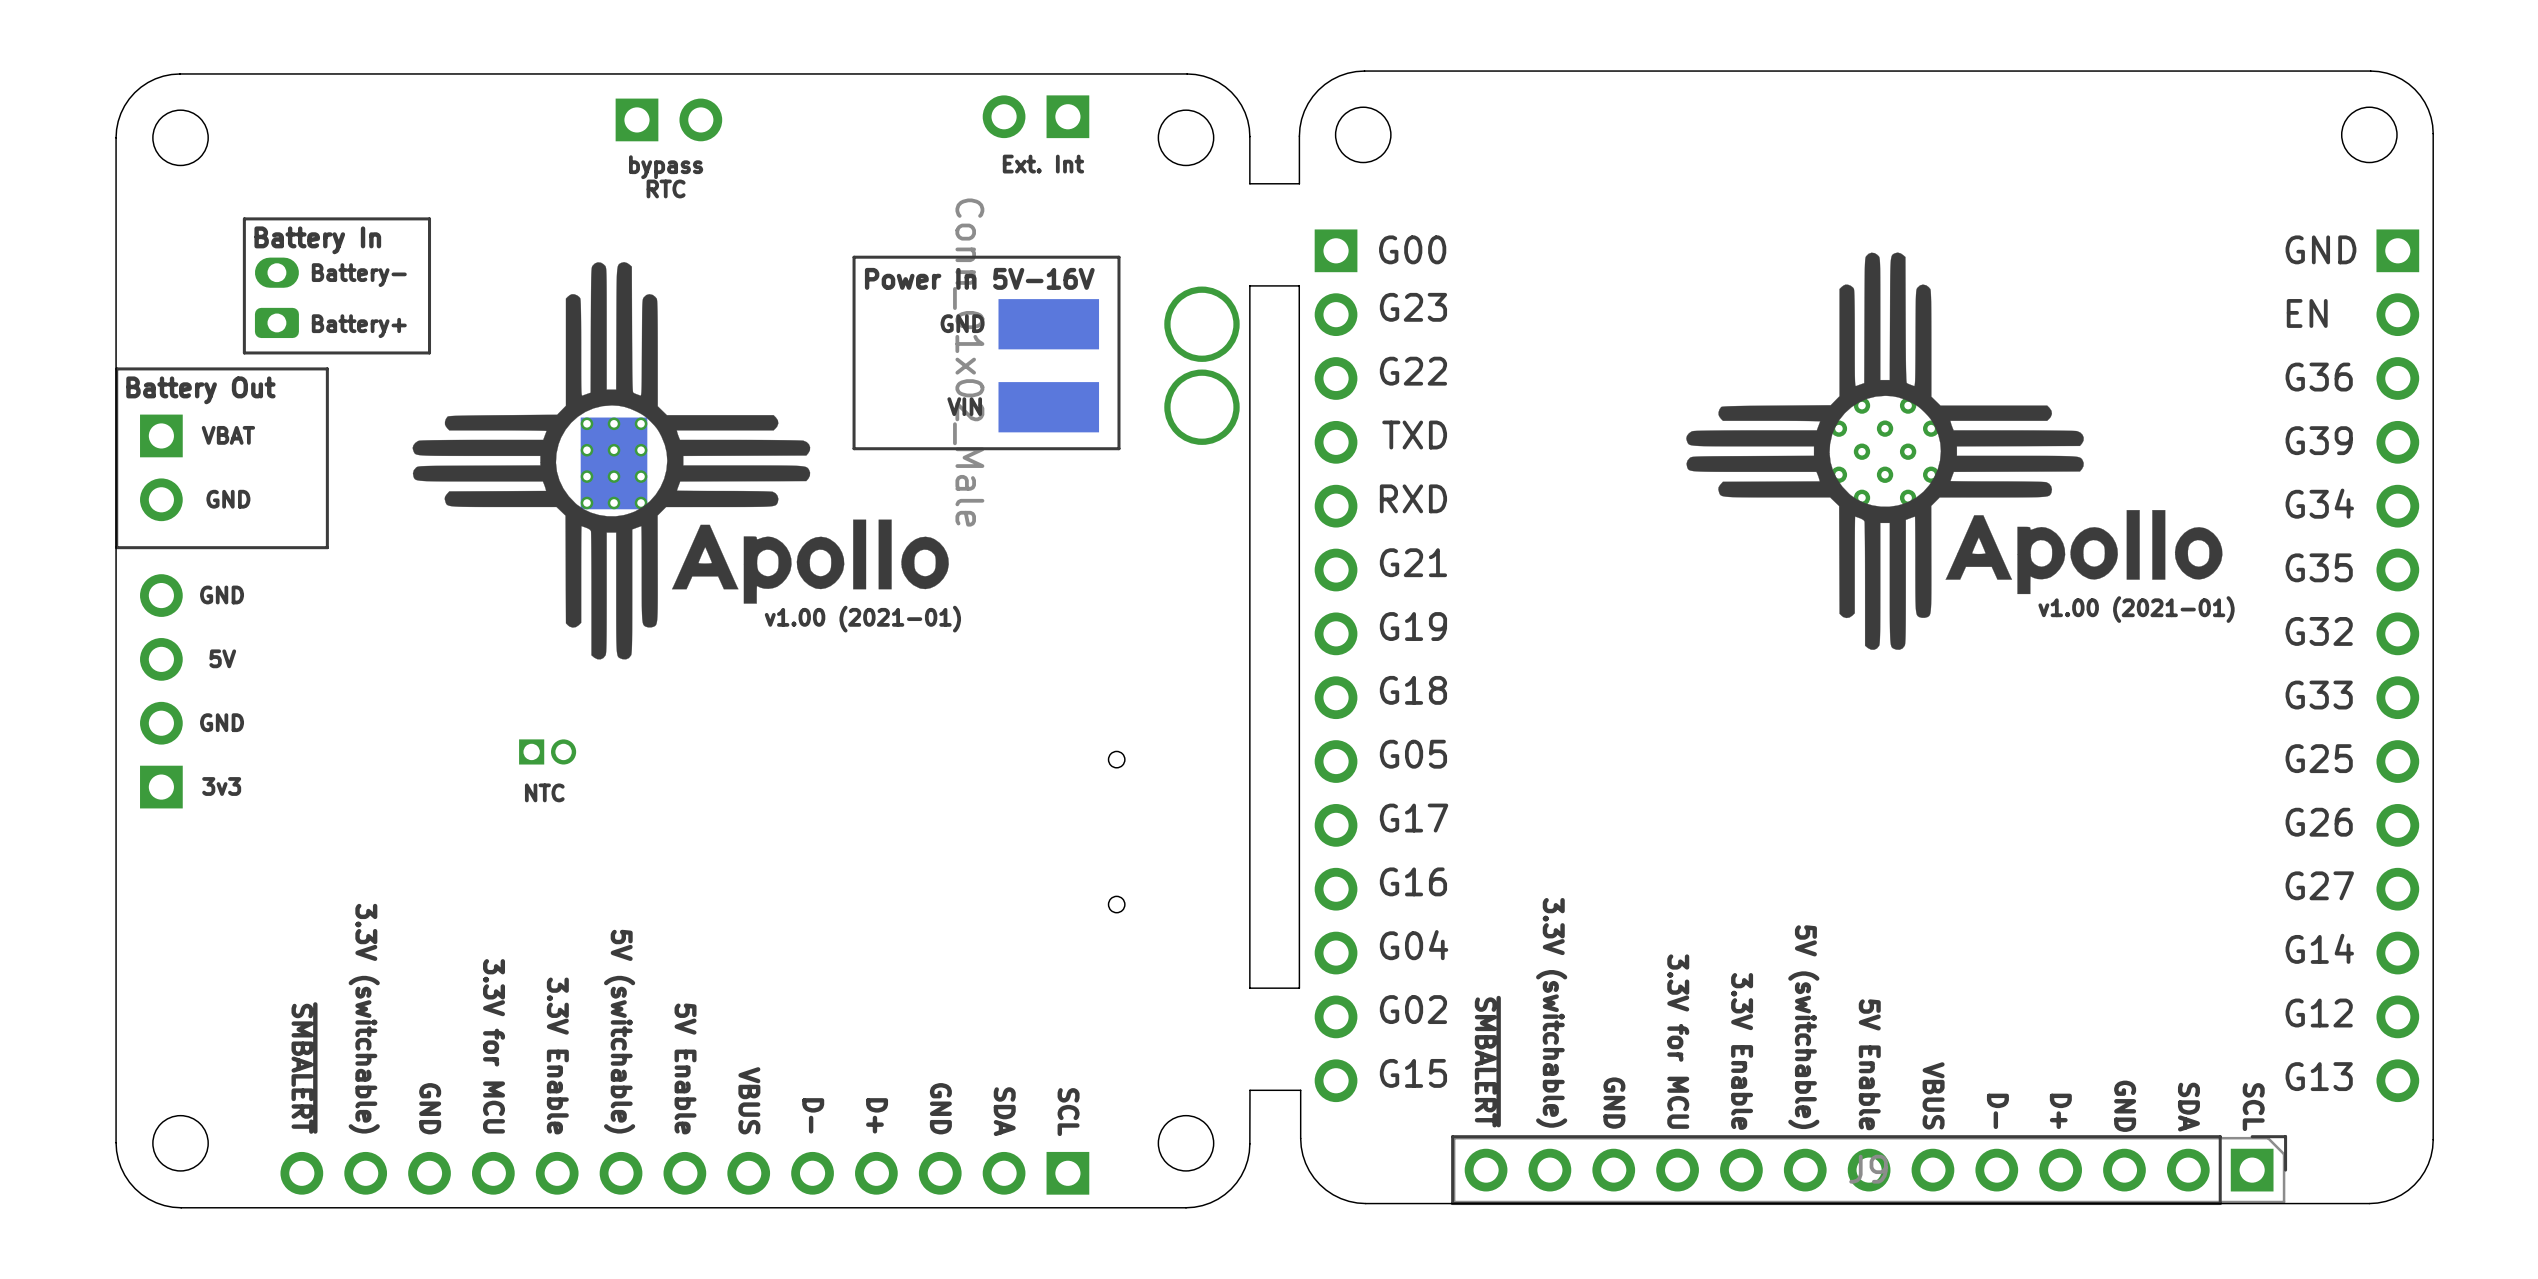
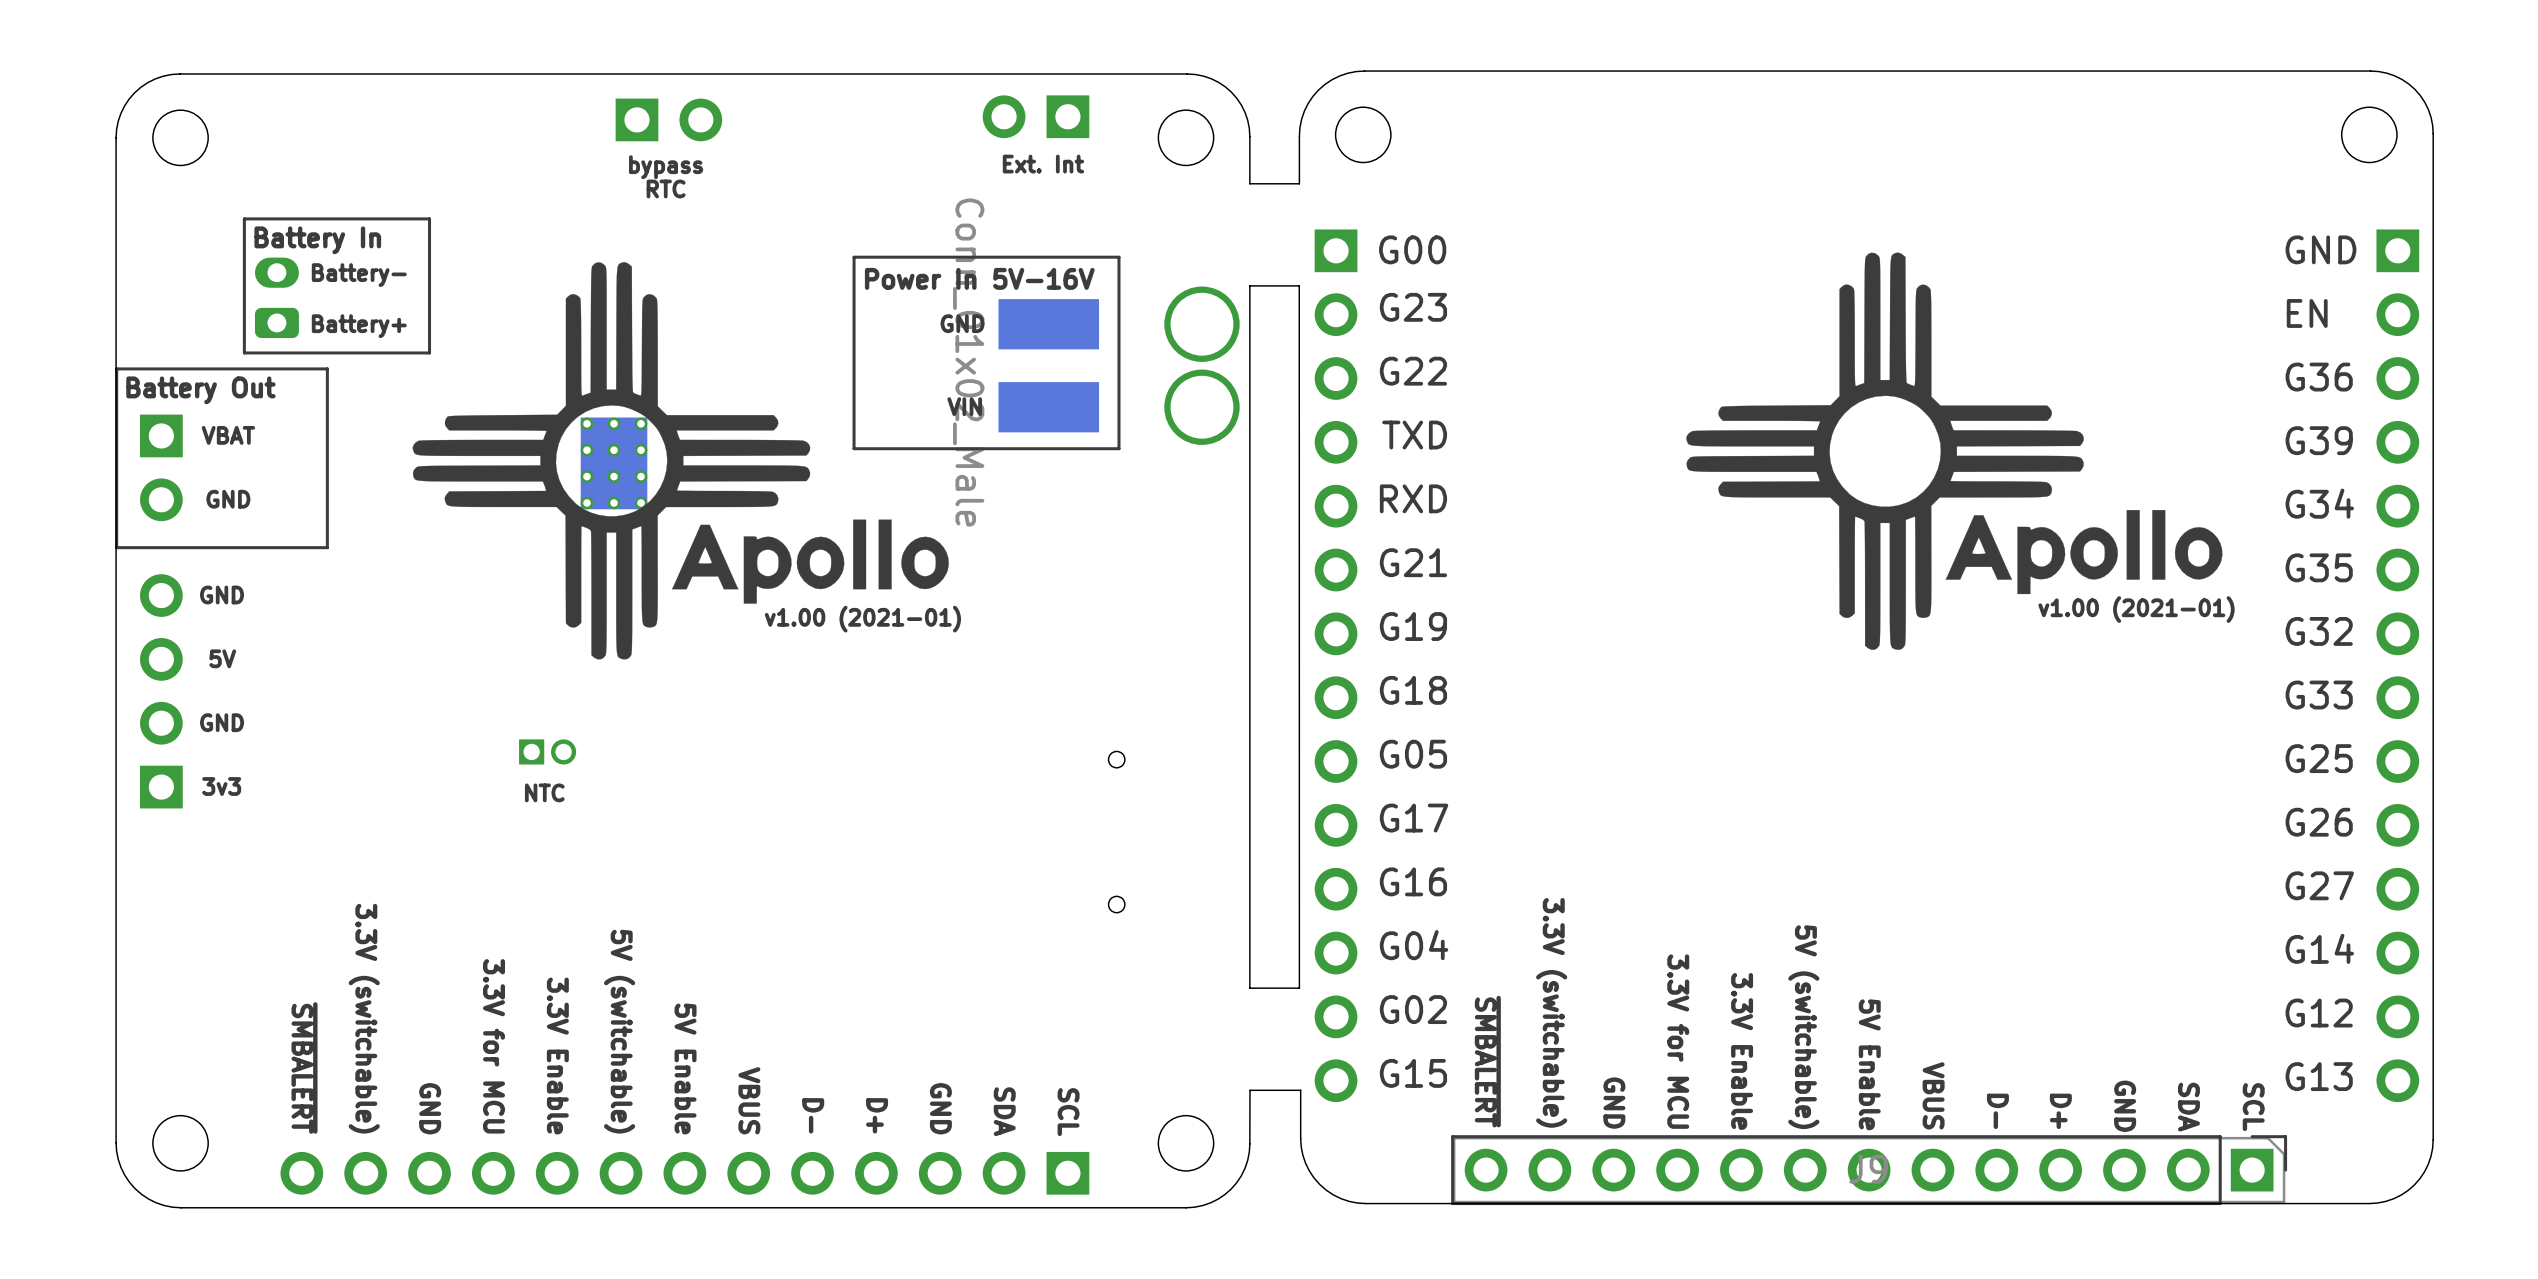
part: (1885, 451) -> none

